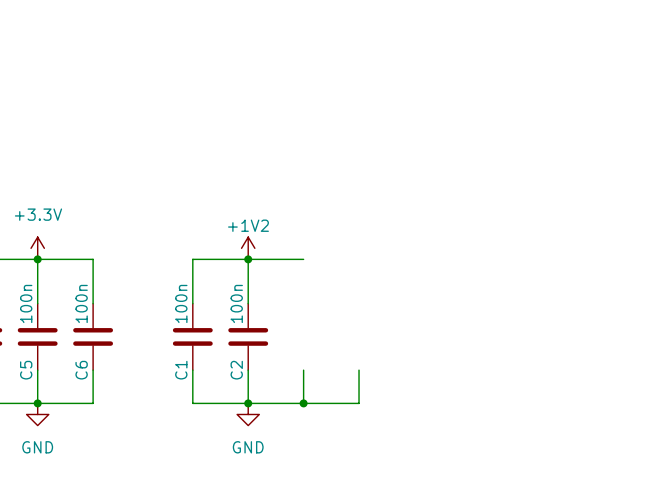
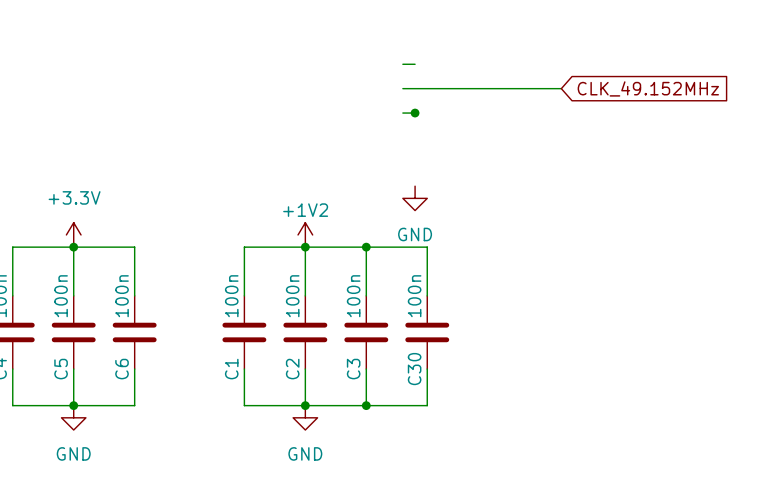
wire: none -> (402, 64) (415, 64)
wire: none -> (402, 88) (561, 88)
global label: none -> CLK_49.152MHz (648, 88)
wire: none -> (402, 113) (415, 113)
junction: none -> (415, 113)
power symbol: none -> GND (415, 198)
junction: none -> (366, 247)
wire: none -> (366, 295) (366, 247) (427, 247) (427, 295)
C3: none -> 100n (366, 332)
C30: none -> 100n (427, 332)

